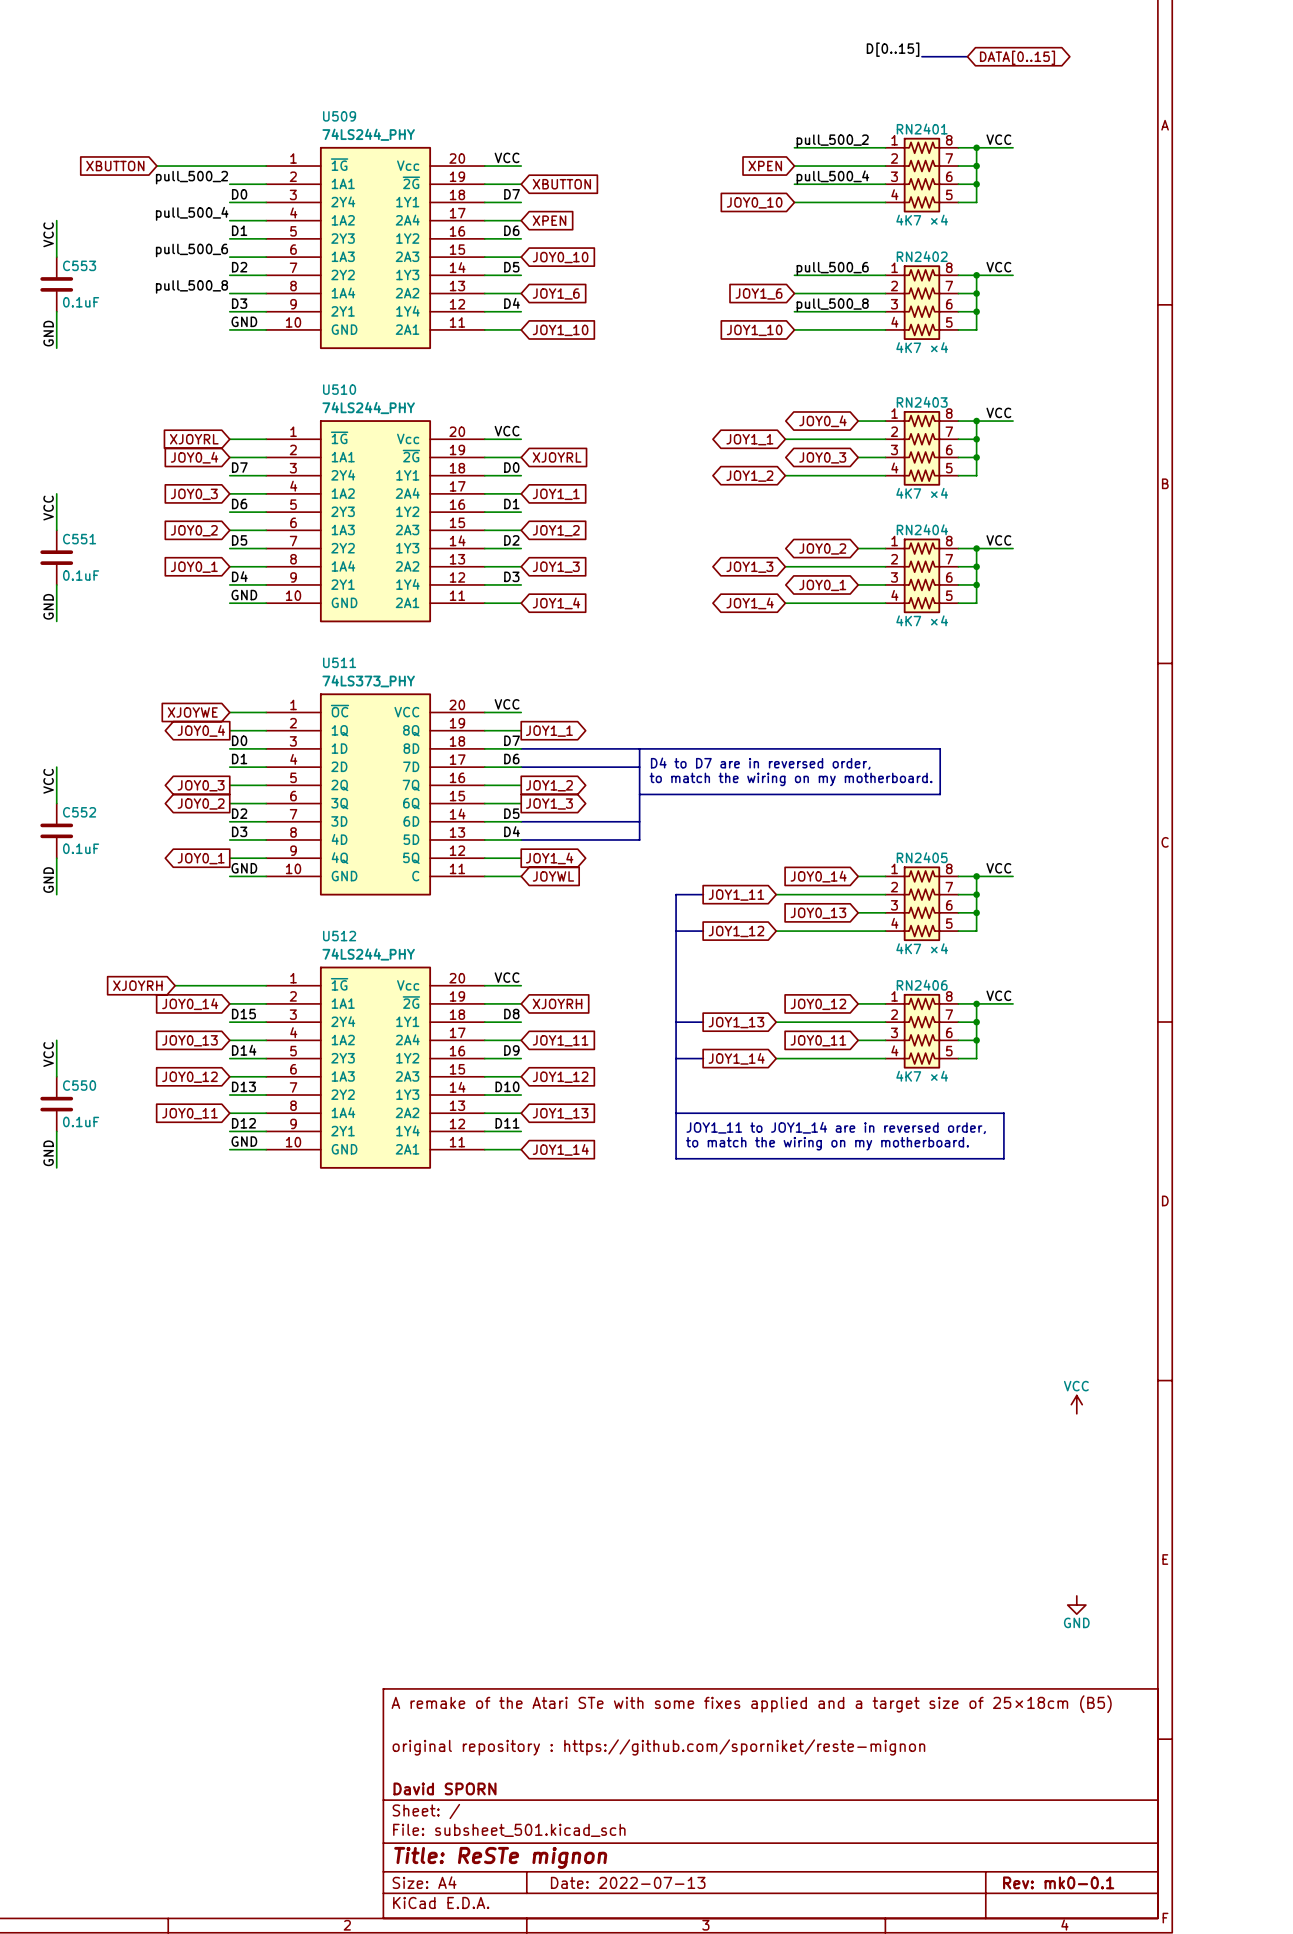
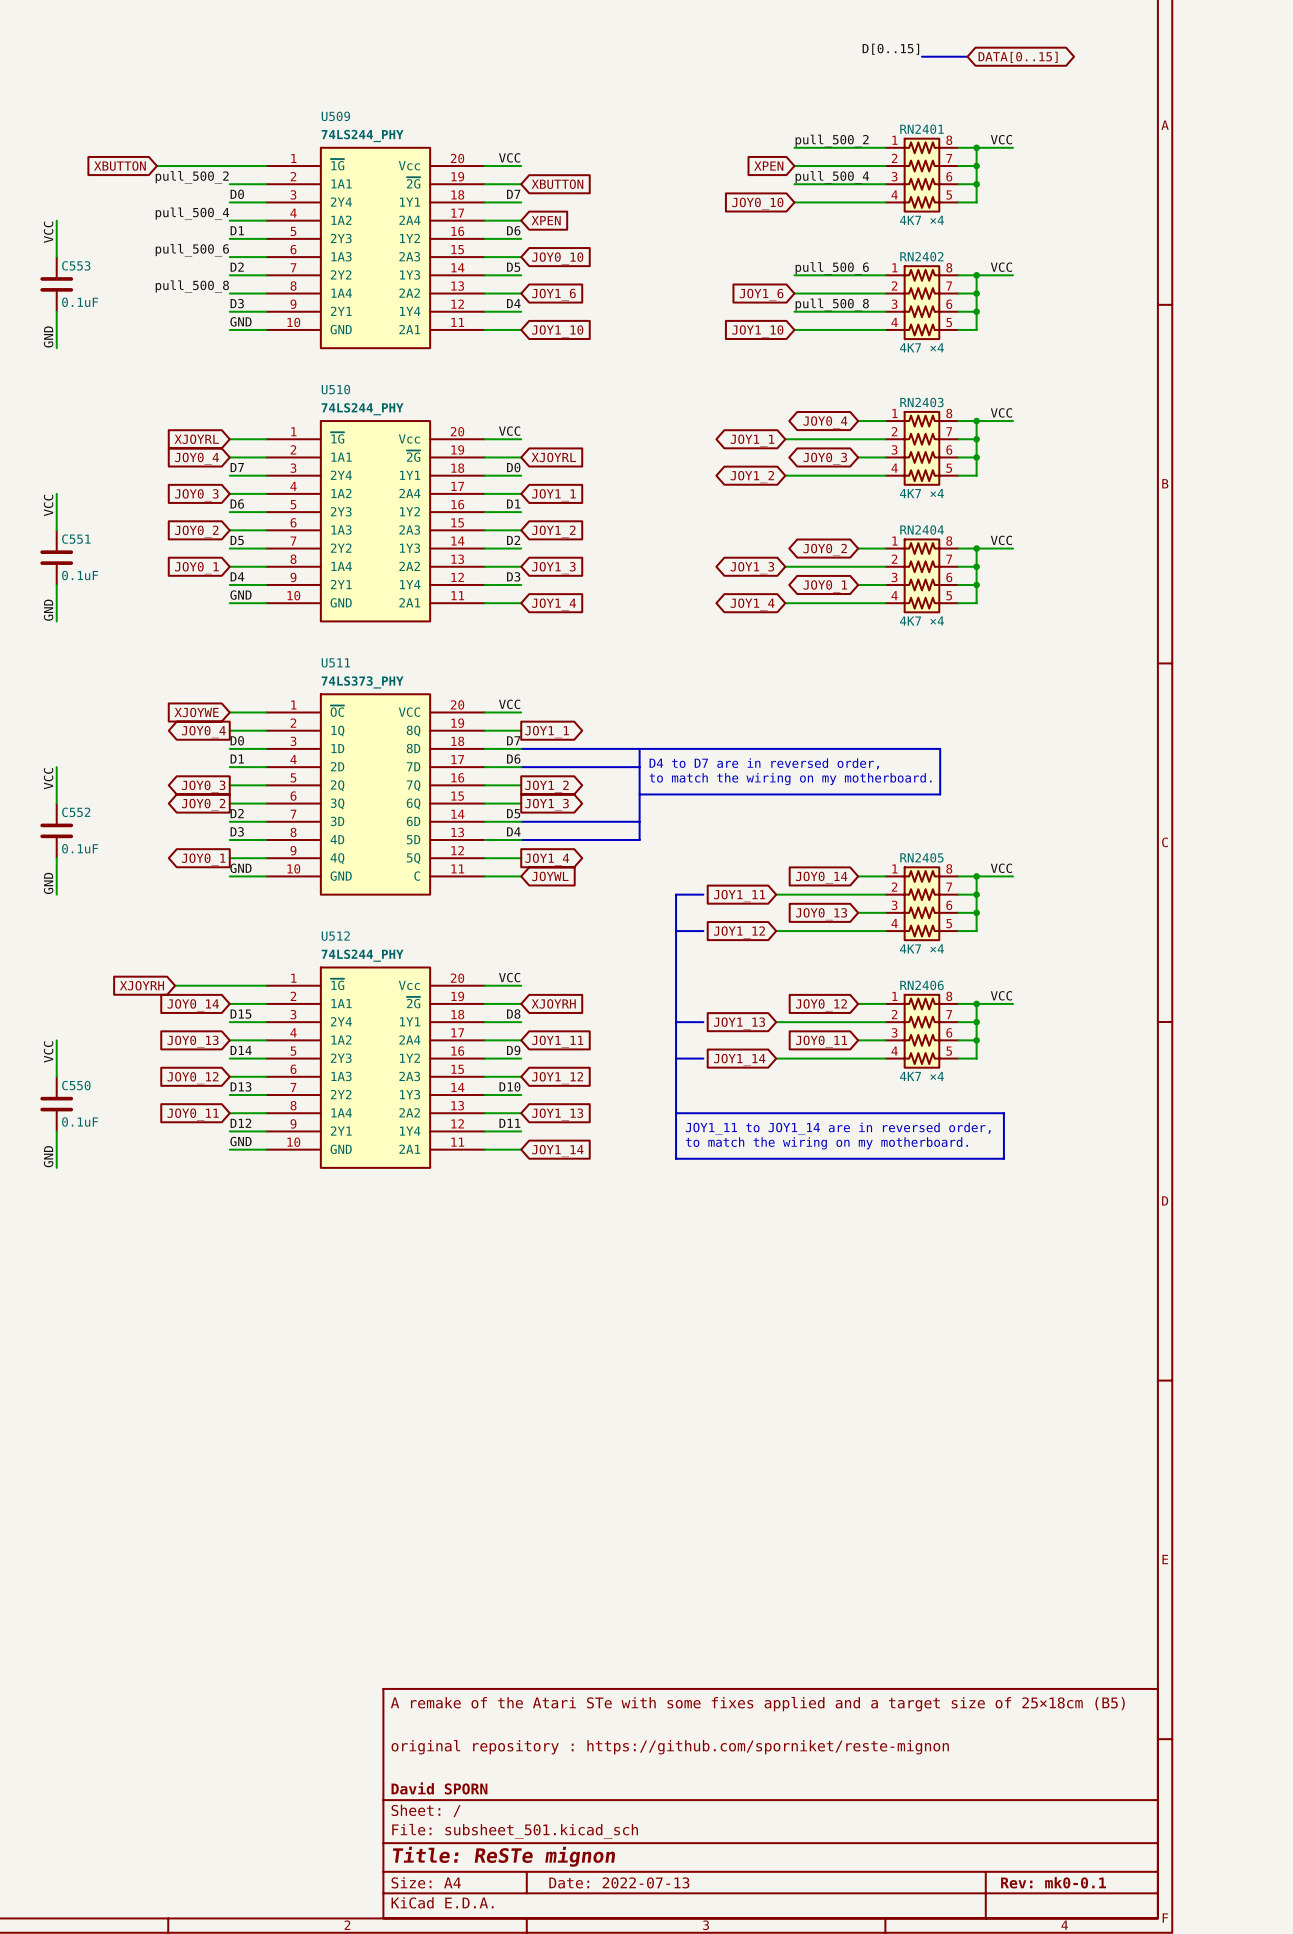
power symbol: VCC (1076, 1404) -> none
power symbol: GND (1076, 1605) -> none

